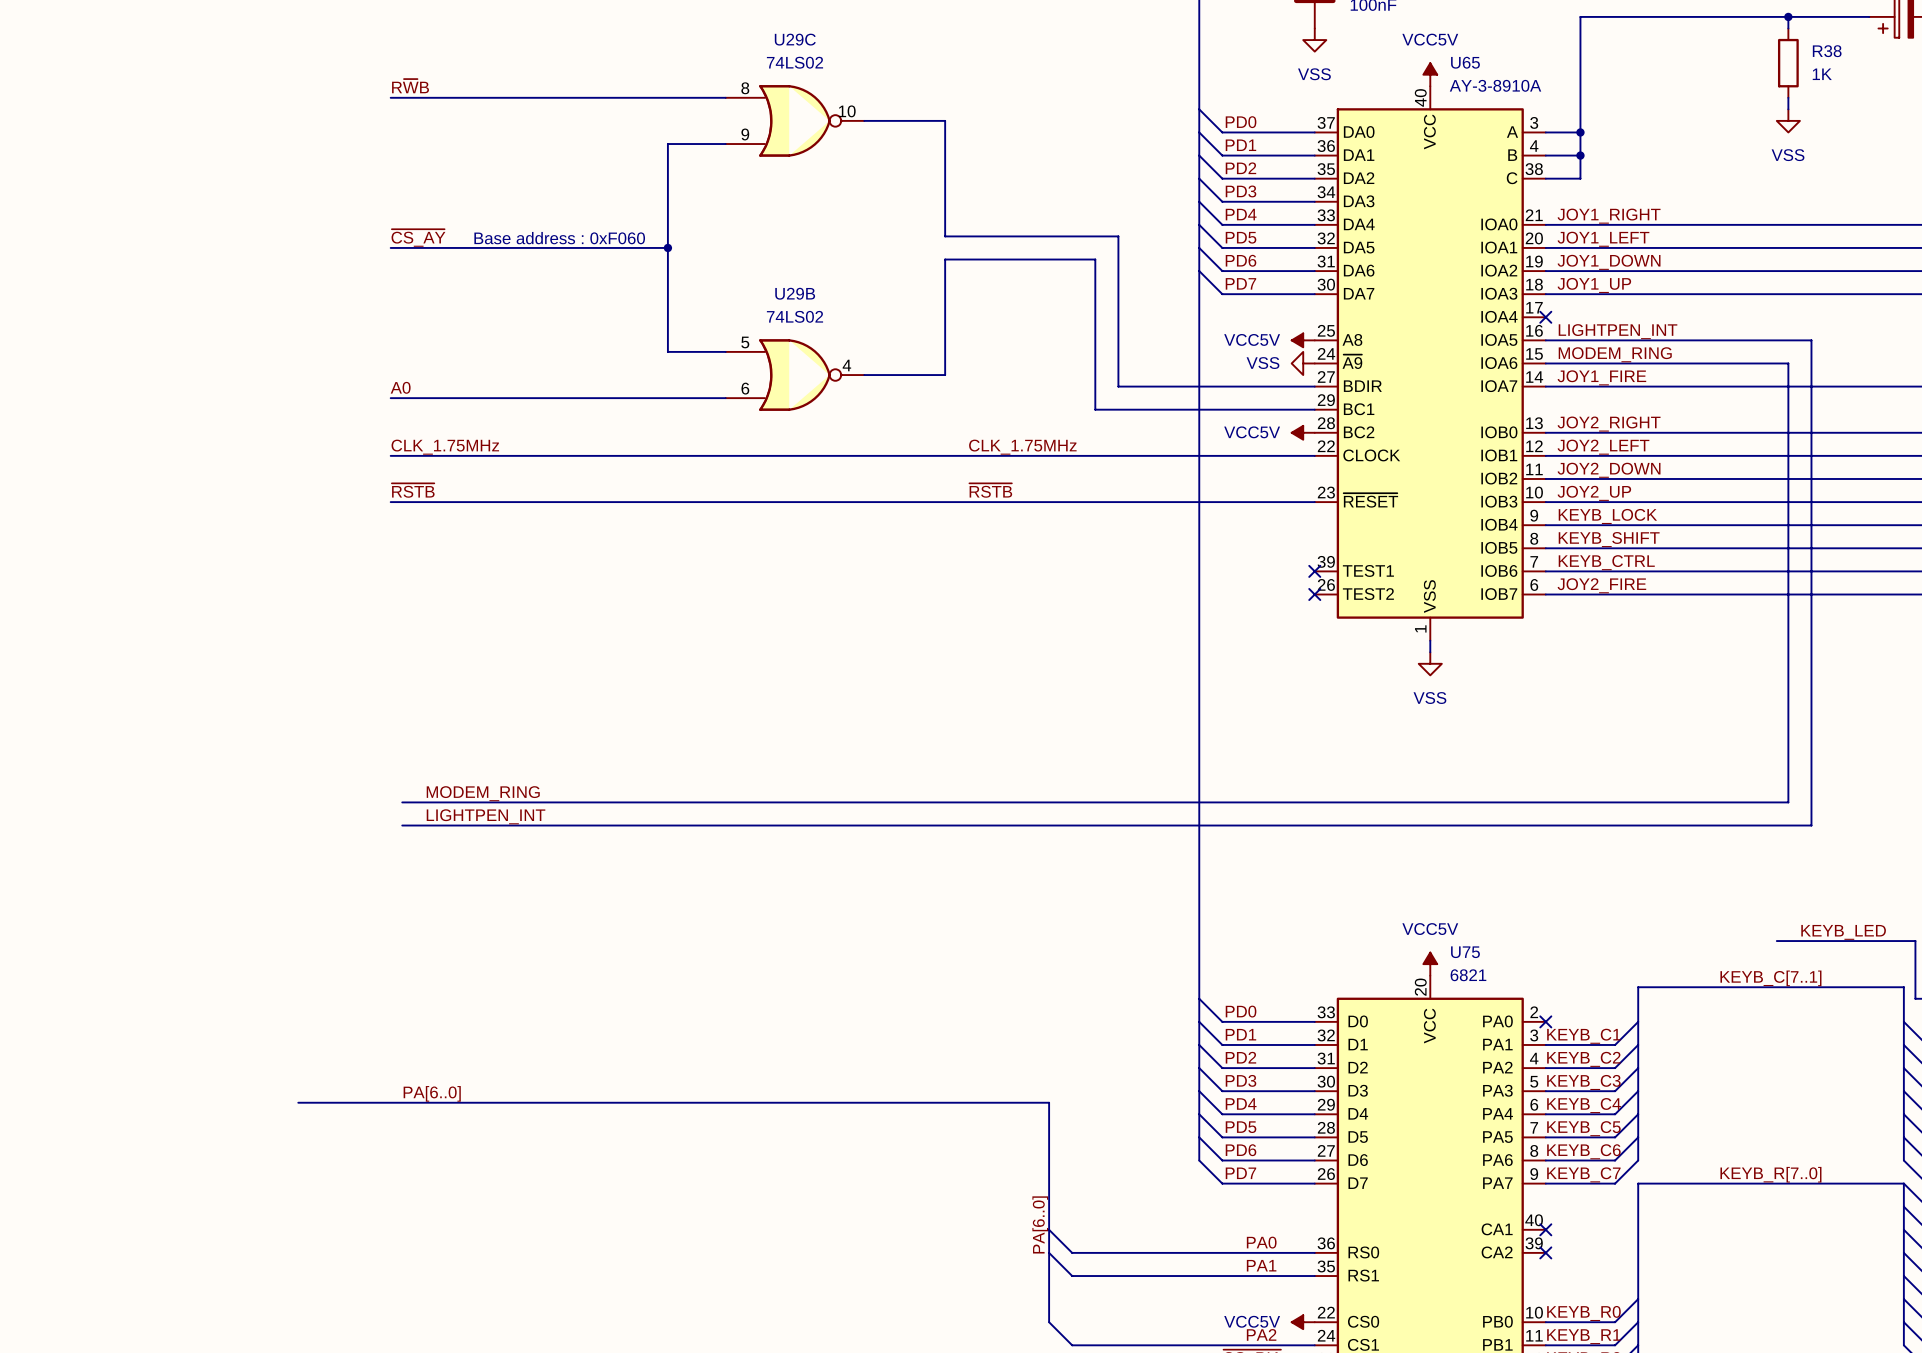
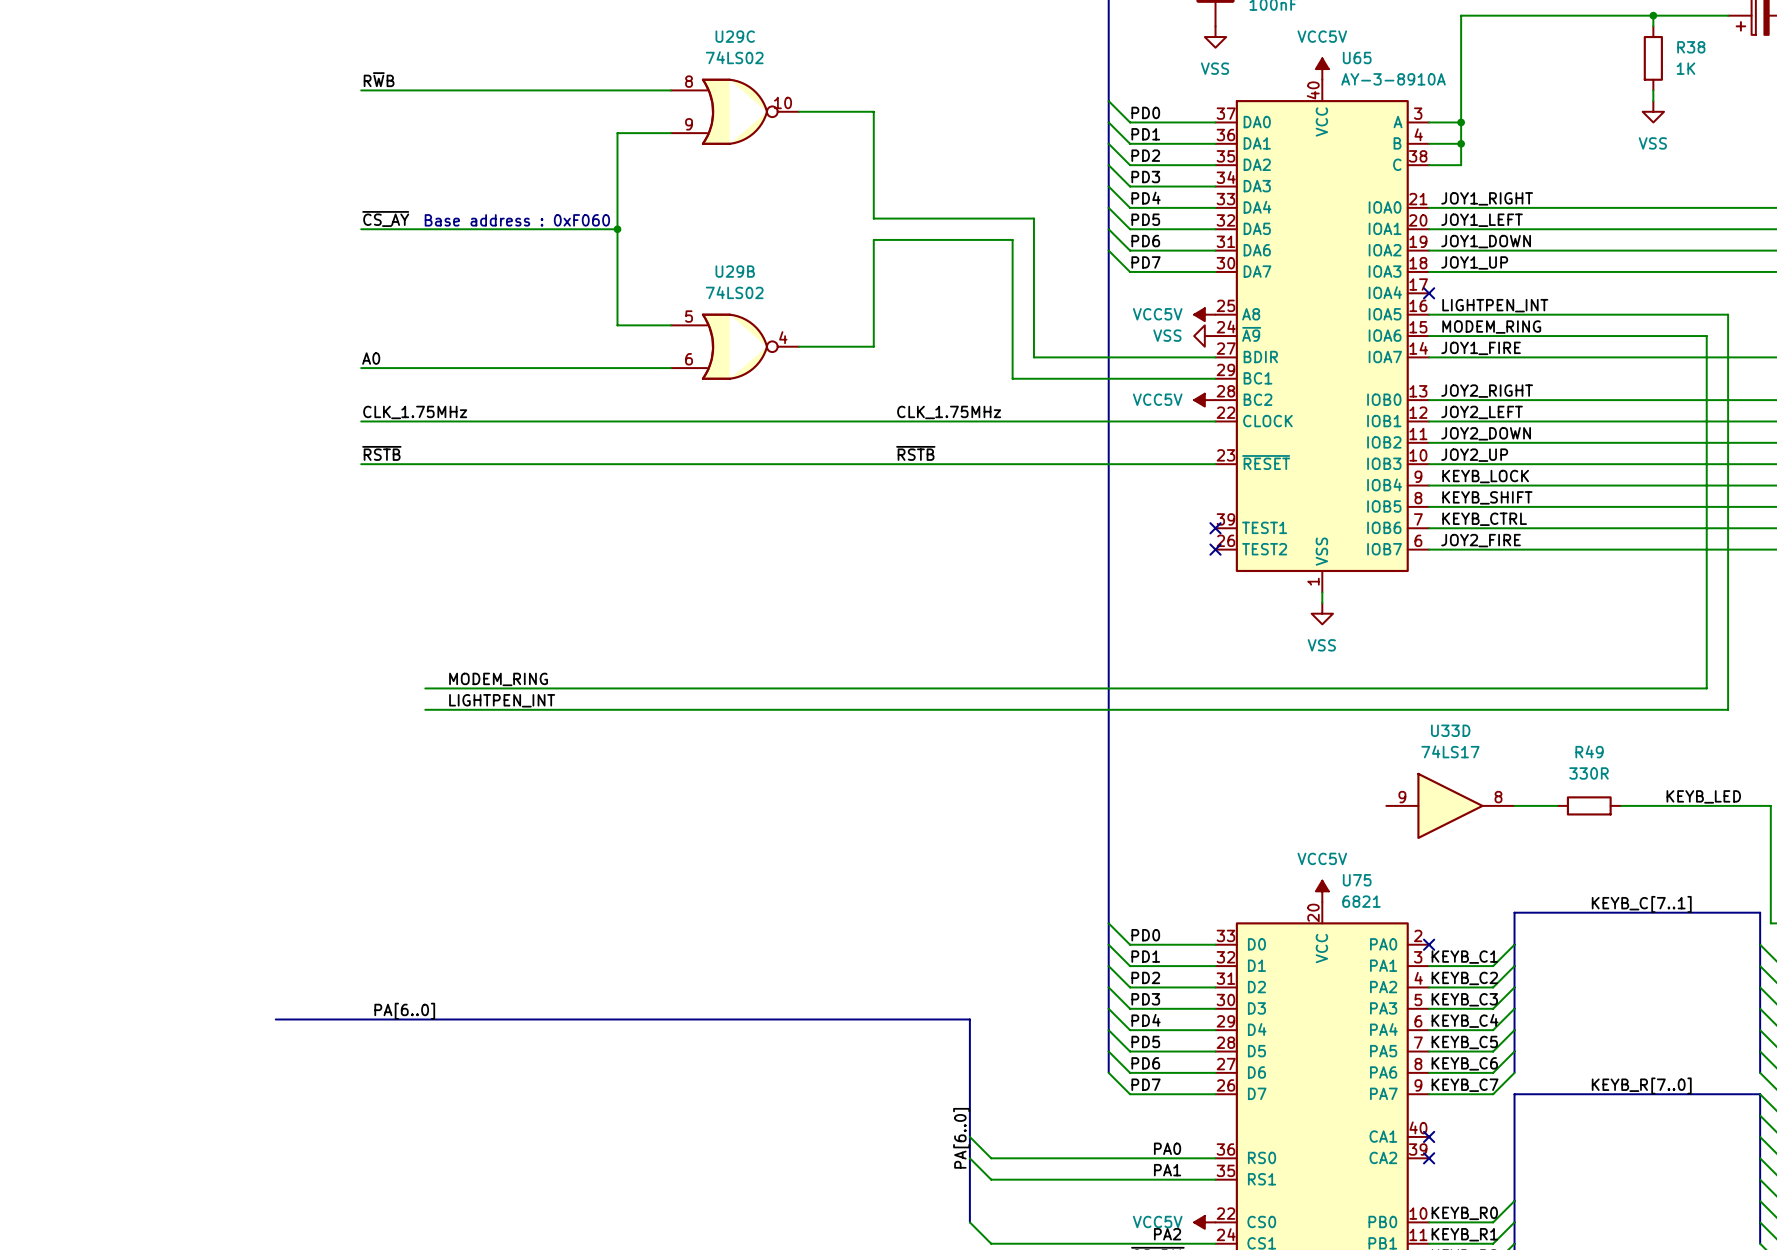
wire: (1811, 340) (1811, 825) (402, 825) -> (1674, 314) (1728, 314) (1728, 709) (425, 709)
wire: (1788, 363) (1788, 802) (402, 802) -> (1653, 336) (1706, 336) (1706, 688) (425, 688)
label position: MODEM_RING (483, 793) -> MODEM_RING (498, 679)
label position: LIGHTPEN_INT (486, 816) -> LIGHTPEN_INT (502, 700)
U33D: none -> 74LS17 (1450, 805)
wire: none -> (1514, 805) (1557, 805)
R49: none -> 330R (1589, 805)
label position: KEYB_LED (1843, 932) -> KEYB_LED (1703, 796)
wire: (1776, 941) (1915, 941) -> (1621, 805) (1770, 805) (1770, 869)

